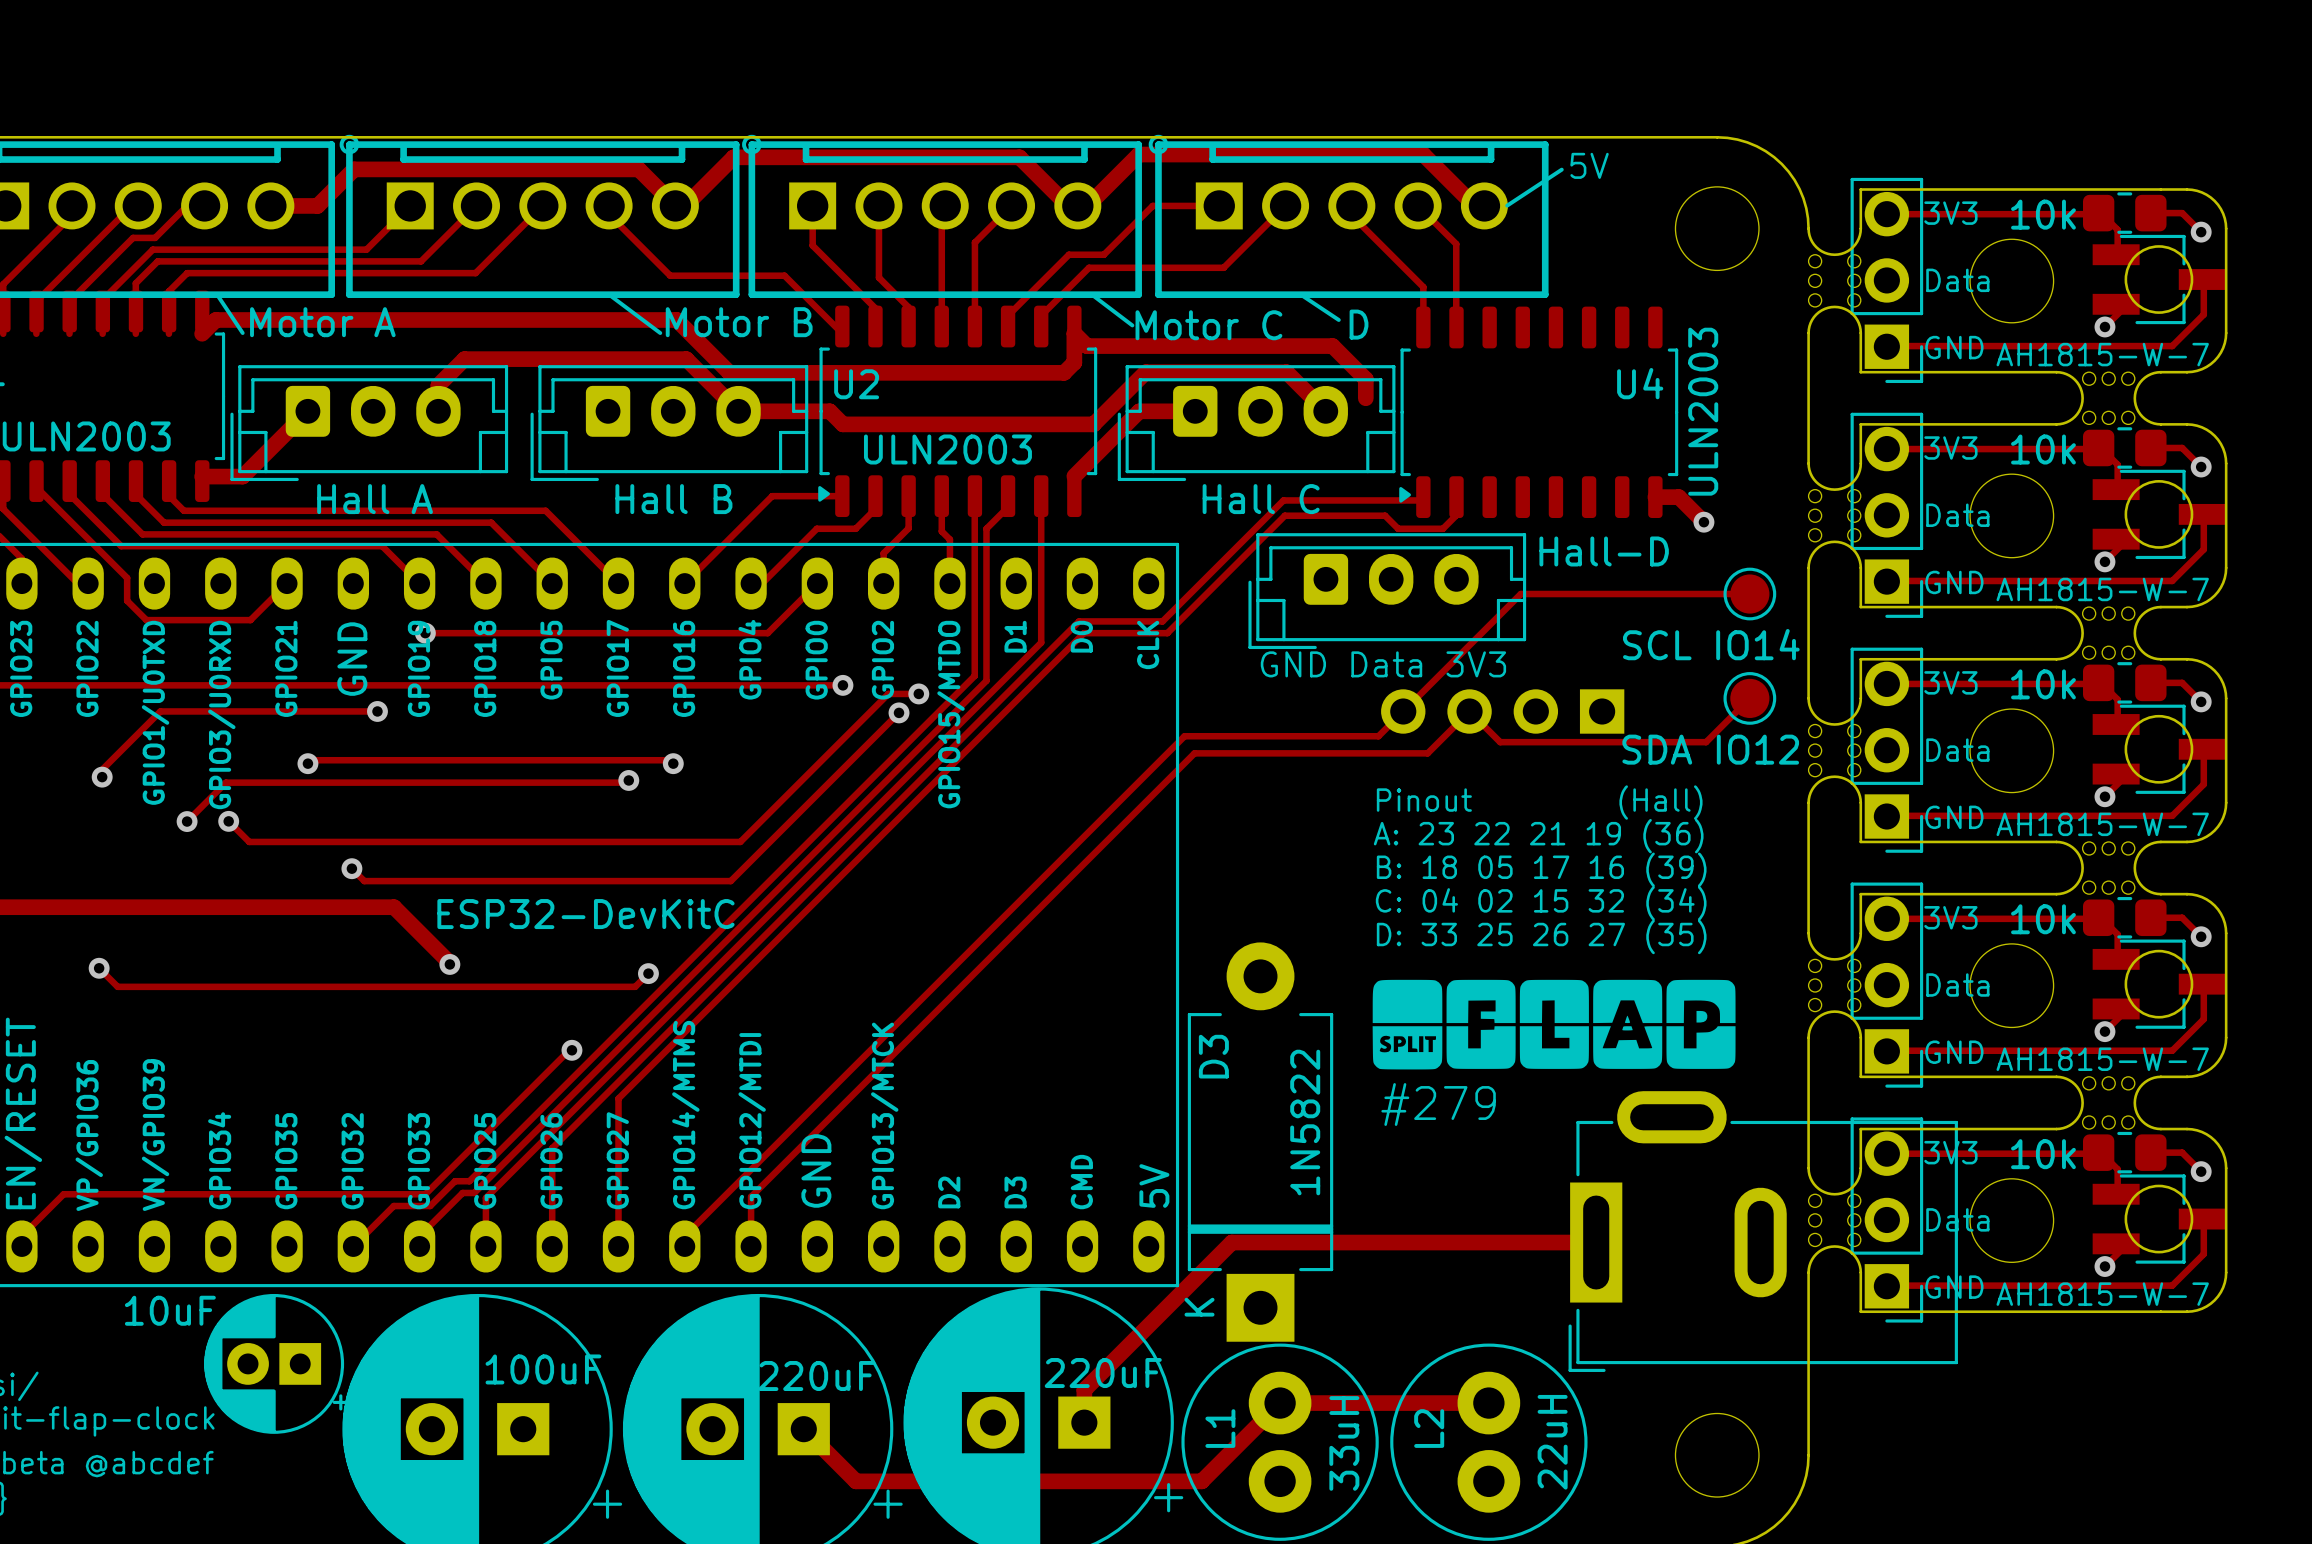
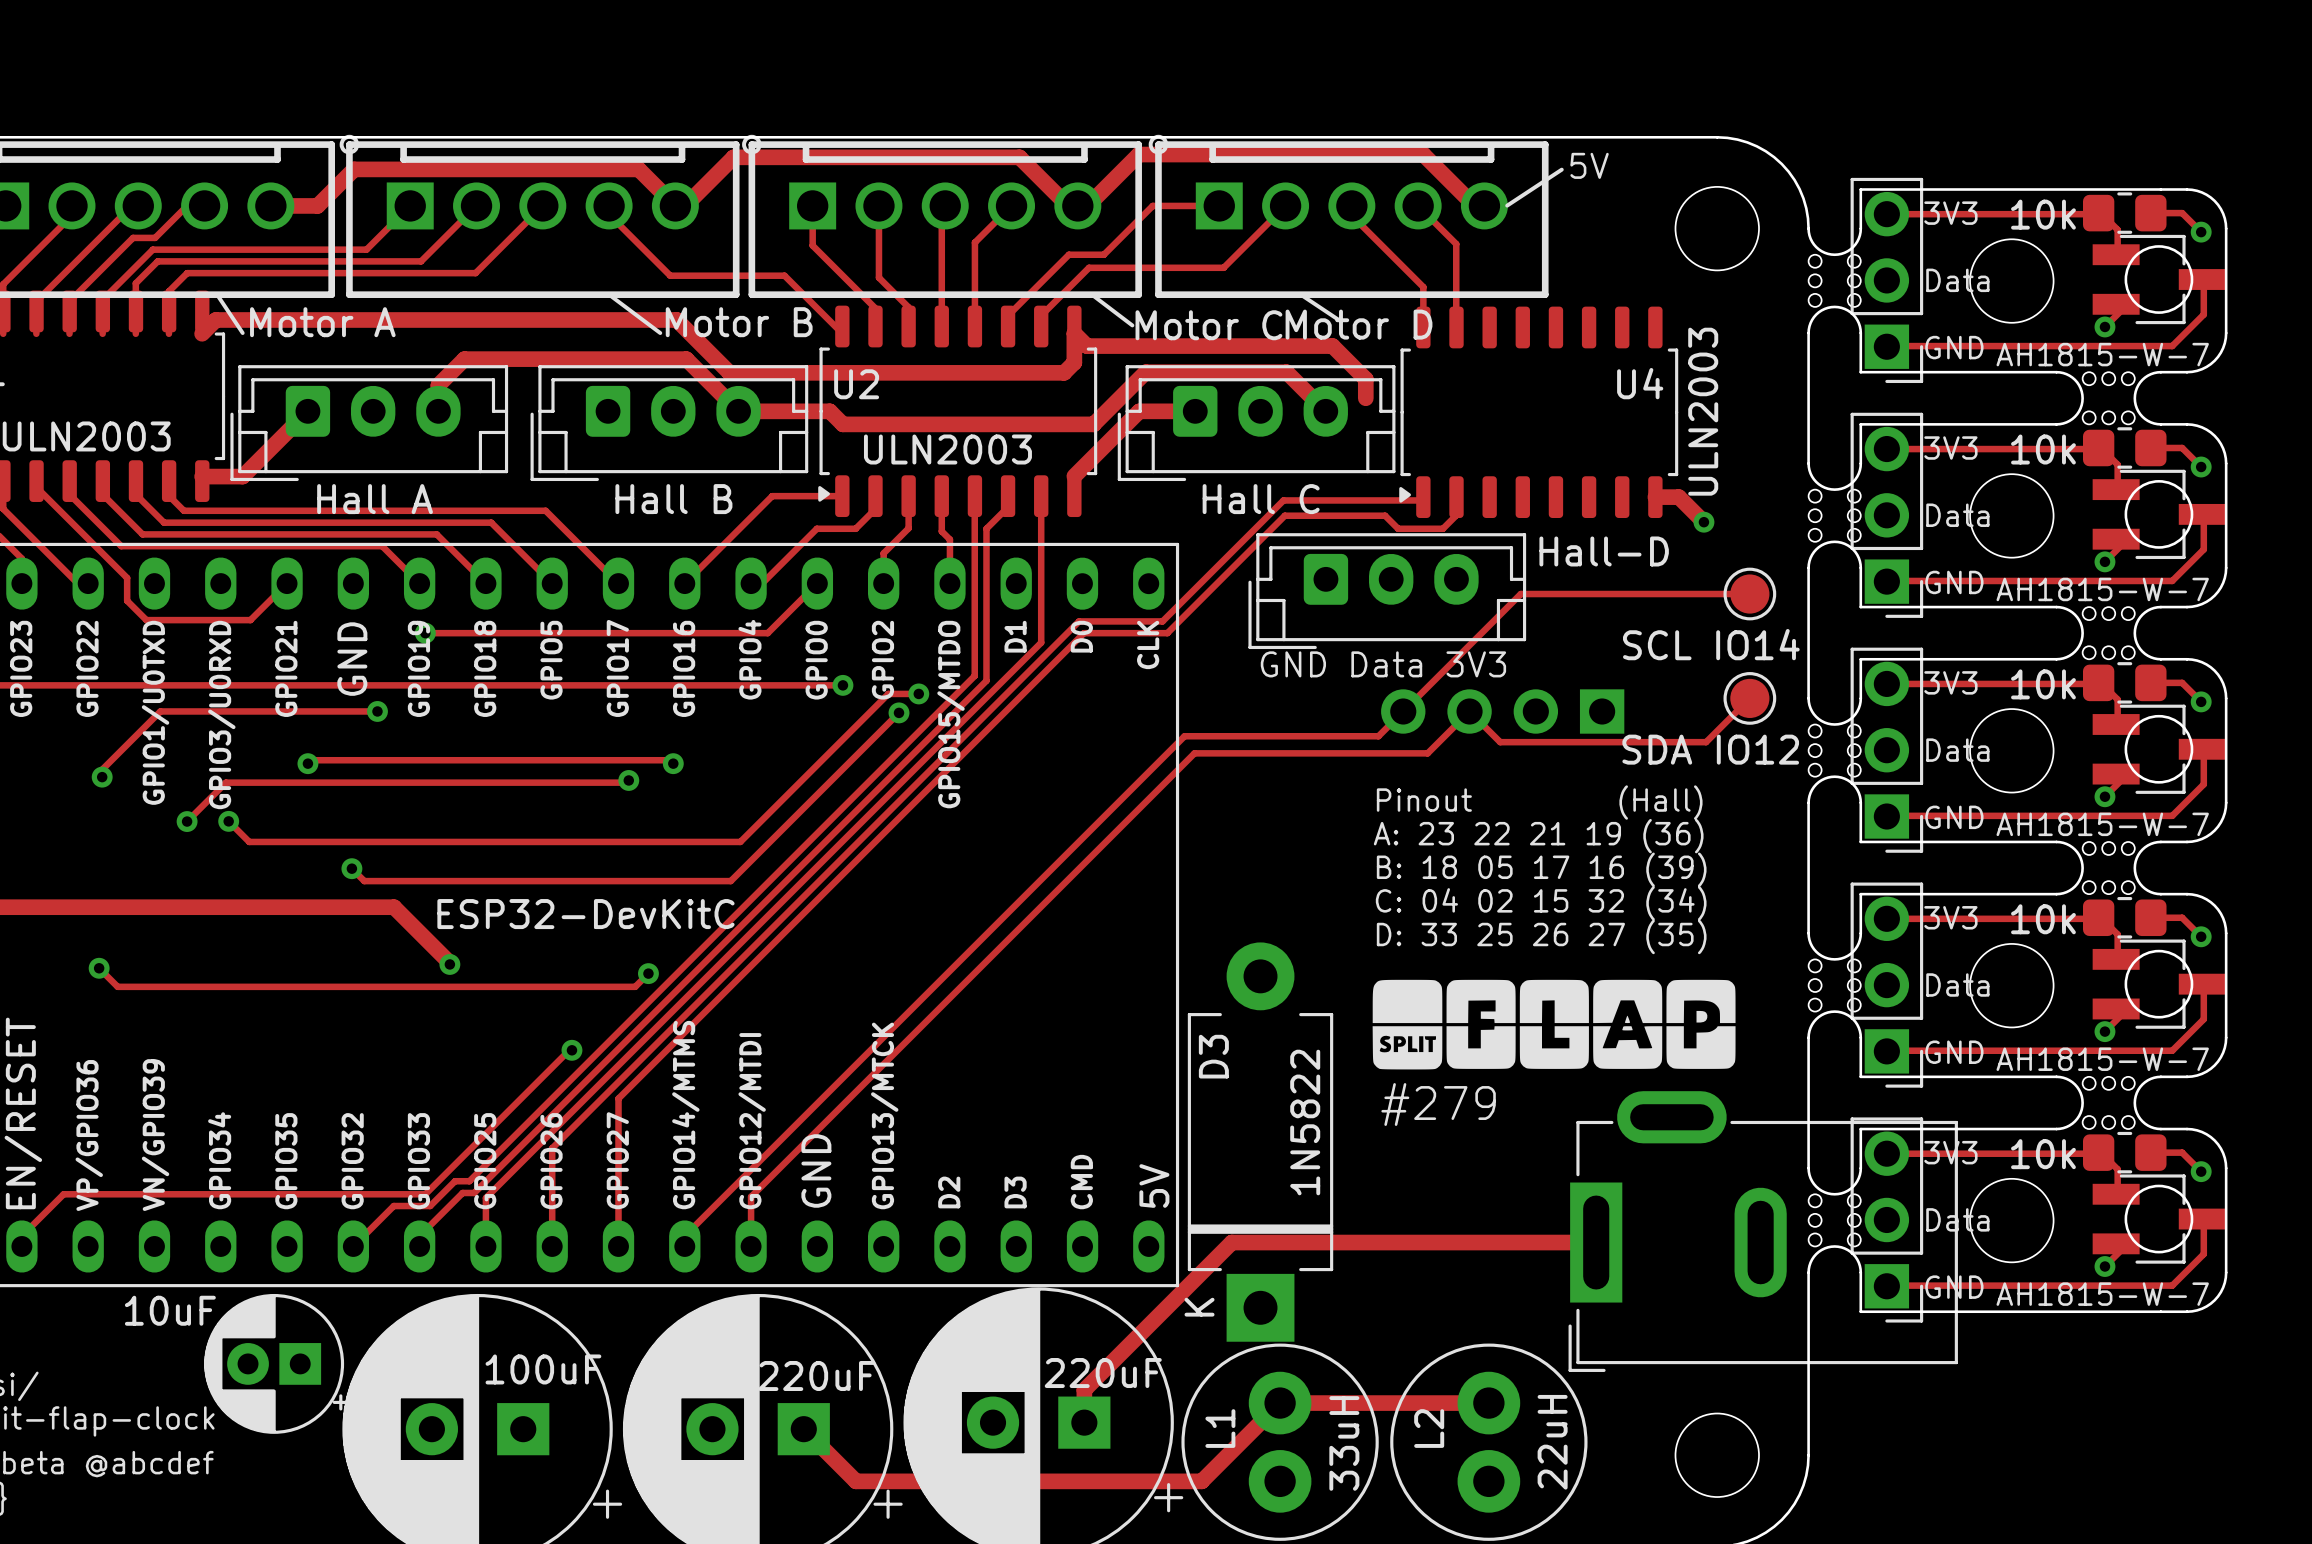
part value: D (1359, 324) -> Motor D (1359, 324)

